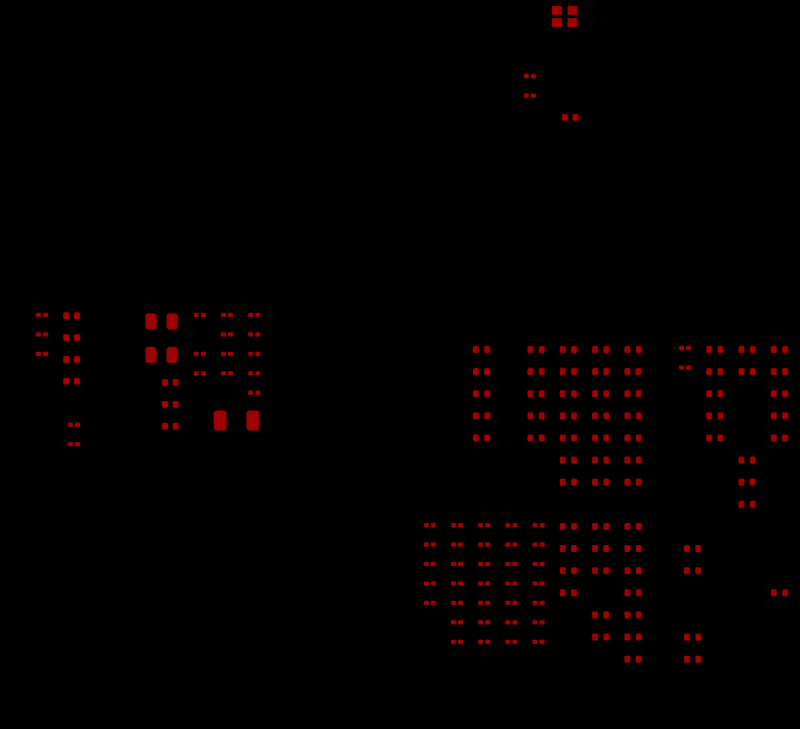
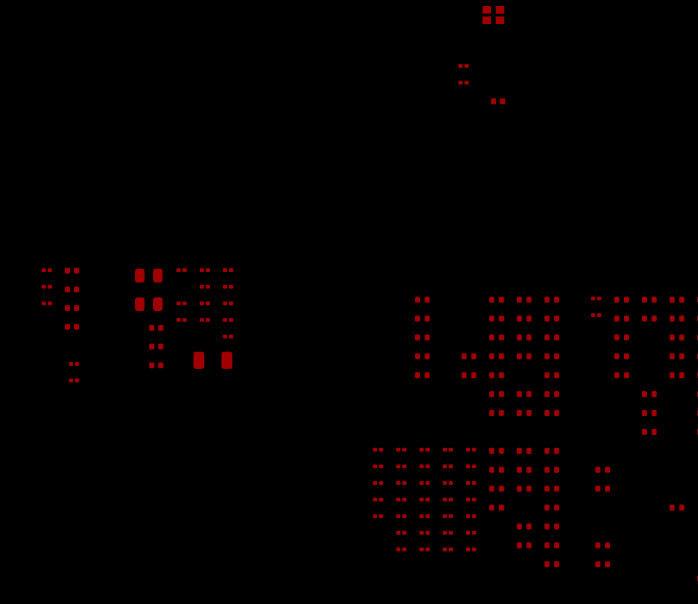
part: (536, 349) -> none
part: (536, 371) -> none
part: (536, 393) -> none
part: (600, 437) -> none

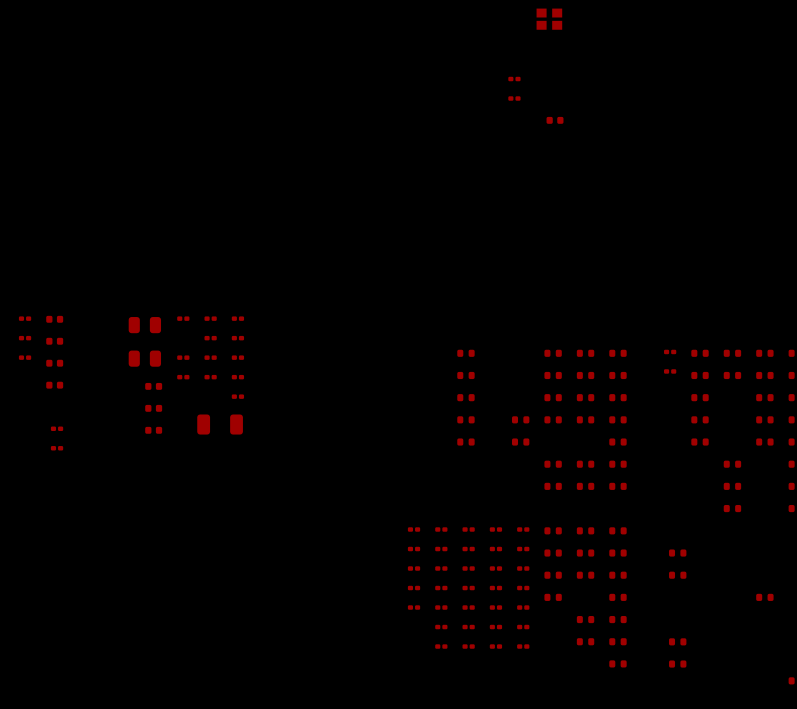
part: (496, 375) -> none

